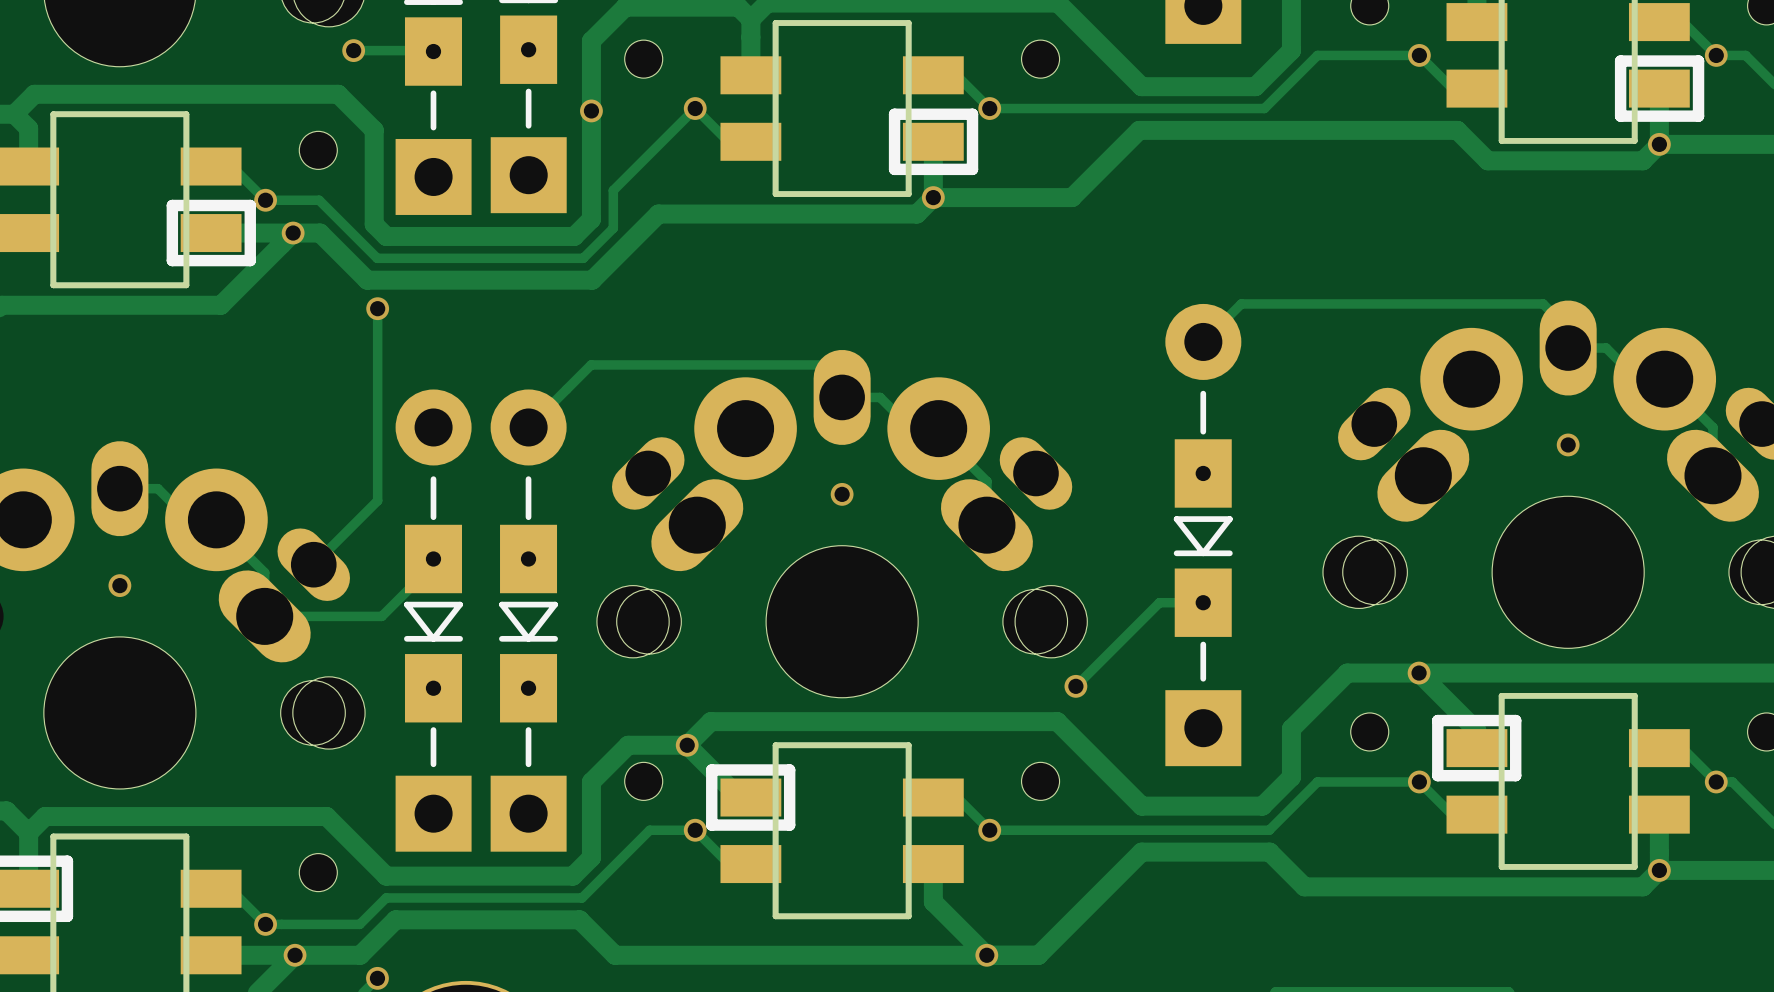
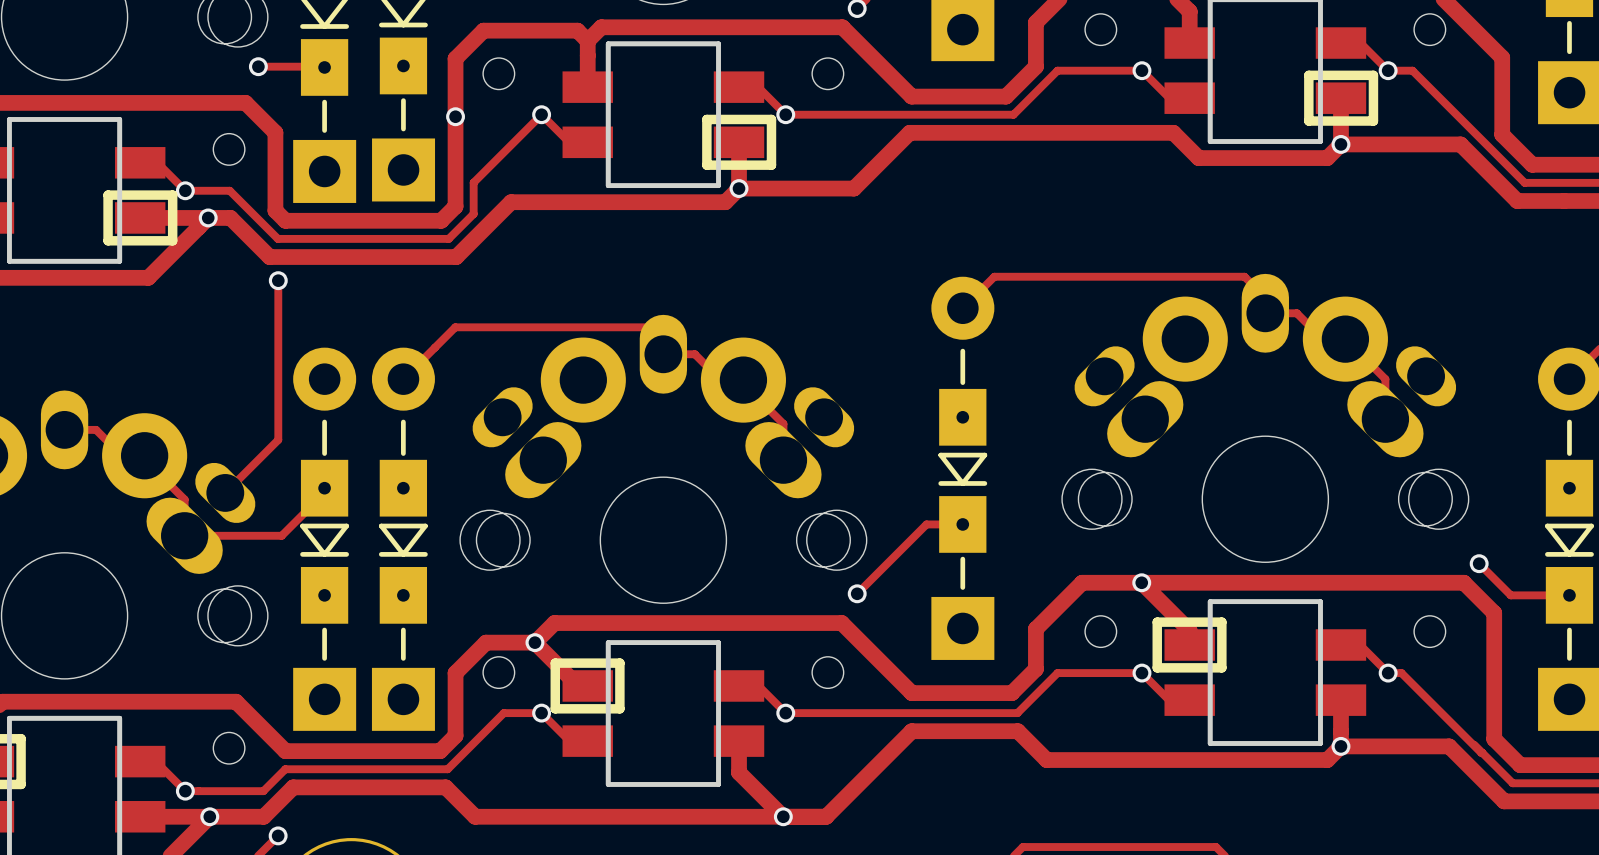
via: (1568, 444) -> none
via: (842, 494) -> none
via: (119, 585) -> none

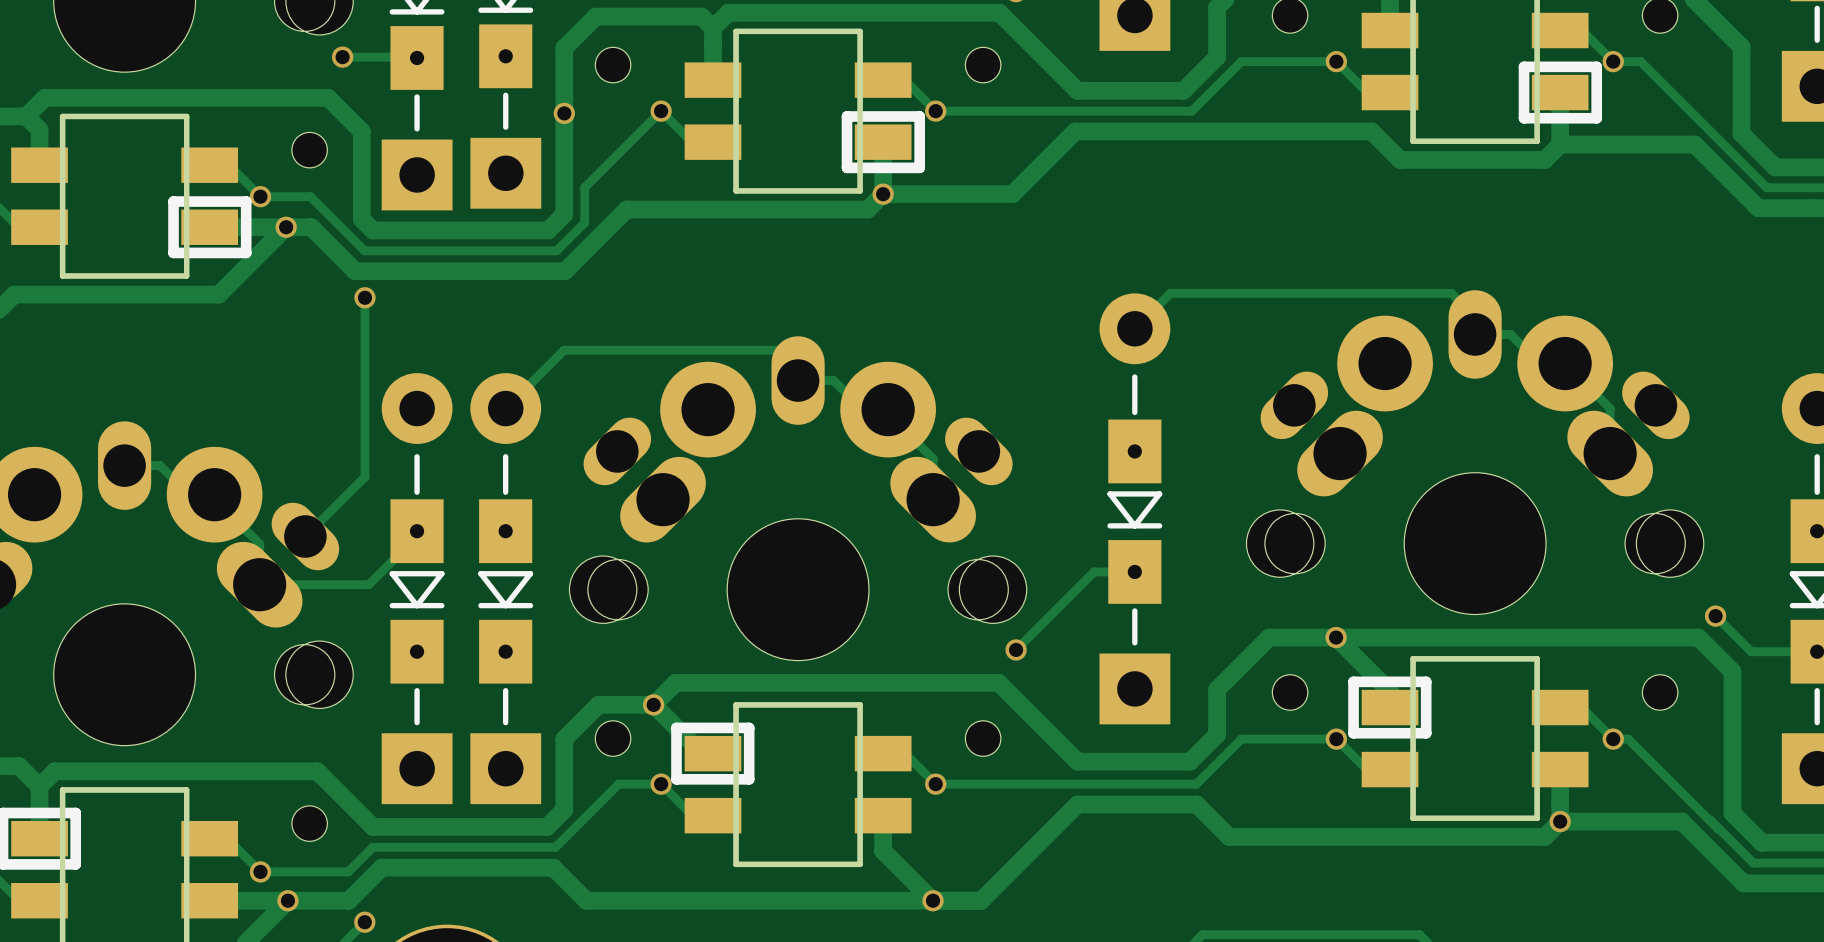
via: (1340, 144) -> none

